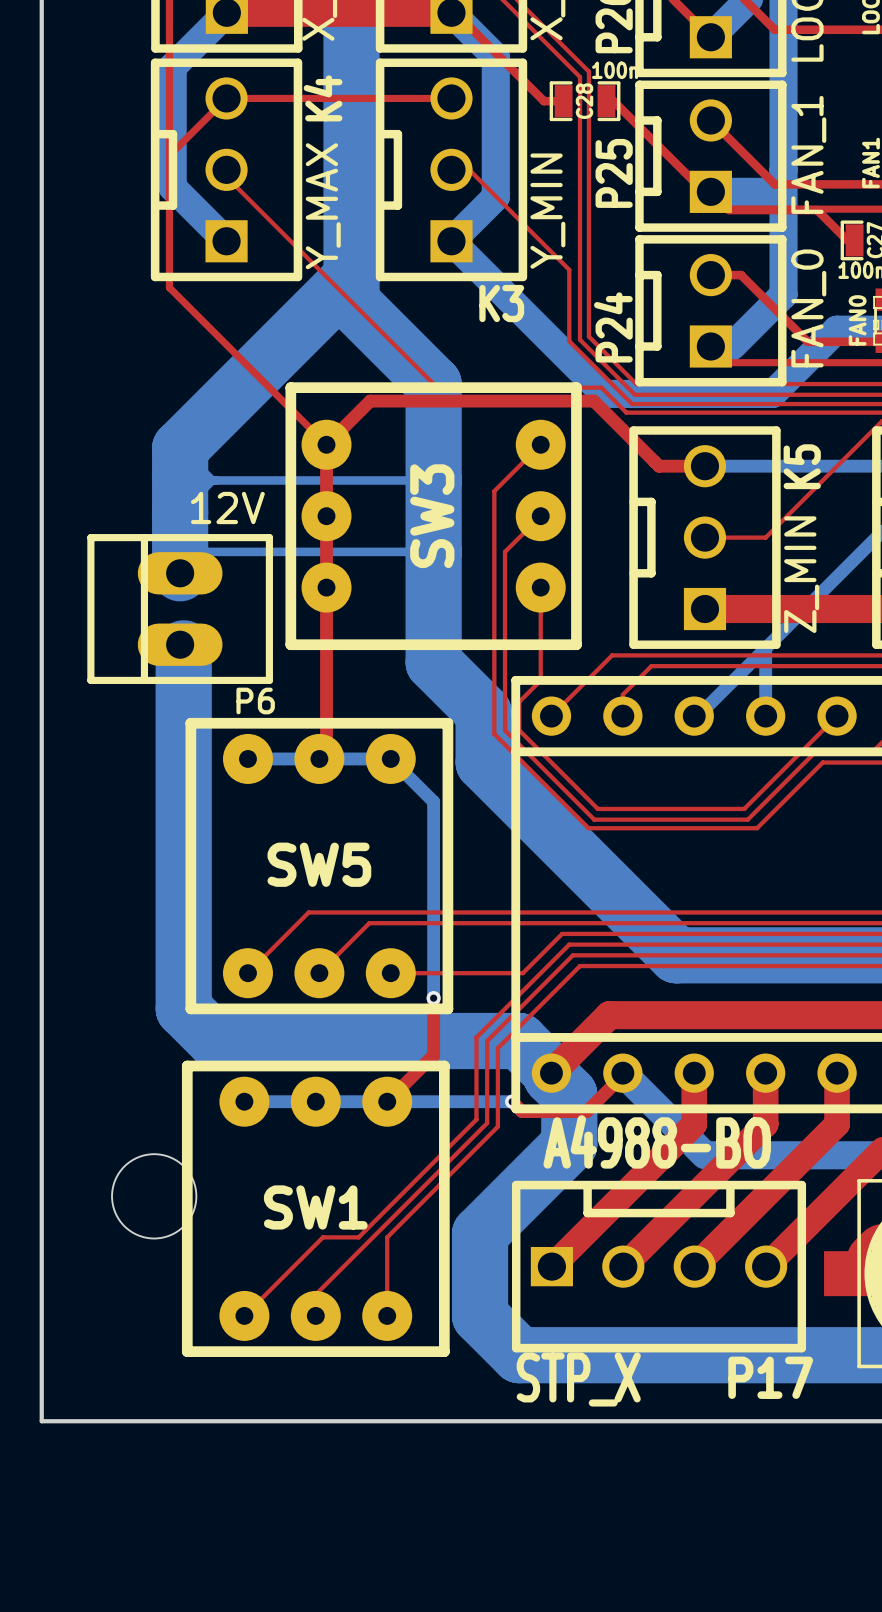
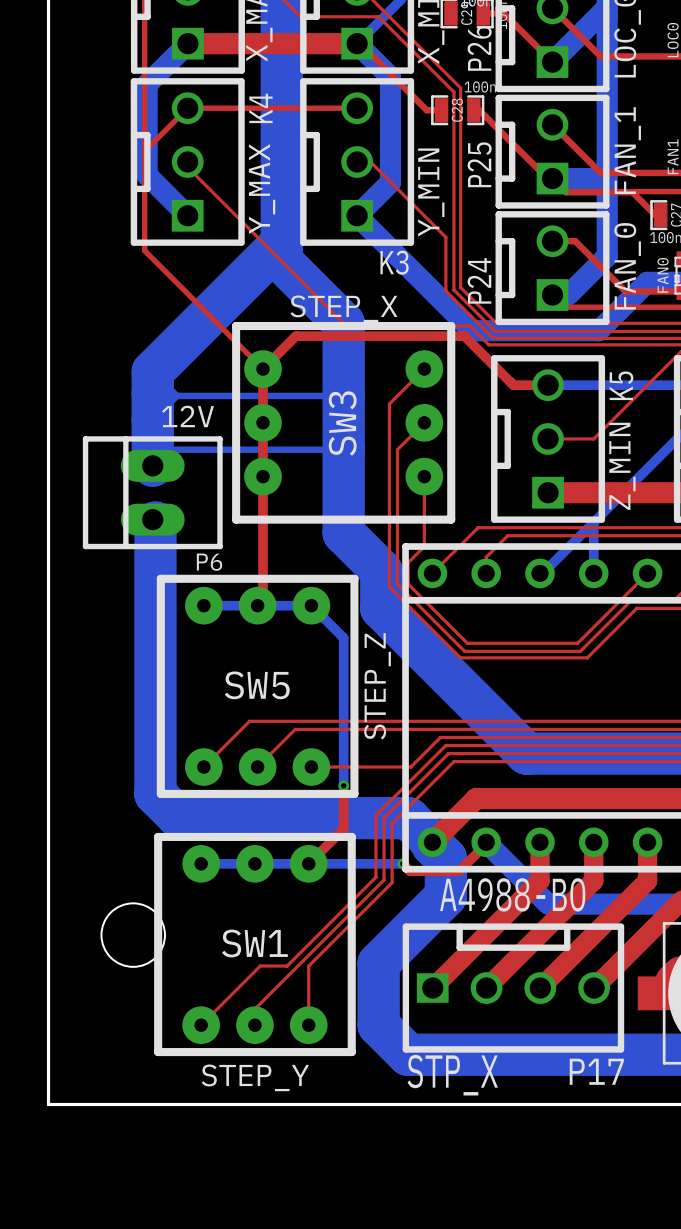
text: none -> STEP_X (343, 308)
text: none -> STEP_Z (377, 686)
text: none -> STEP_Y (255, 1077)

